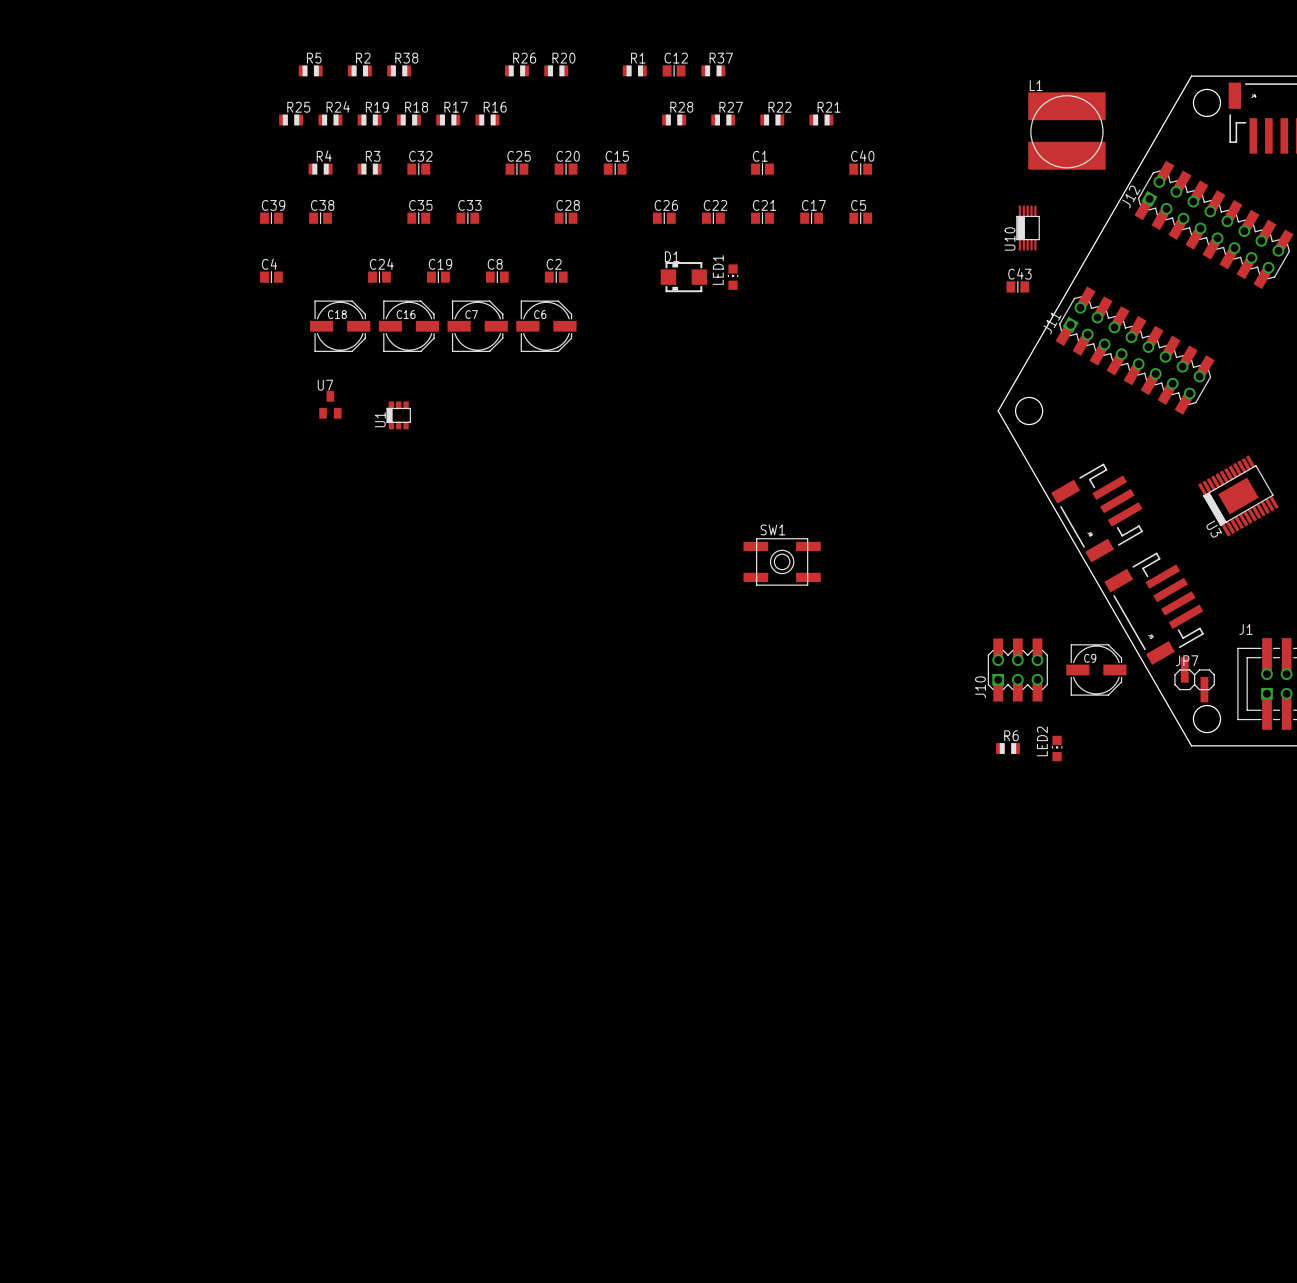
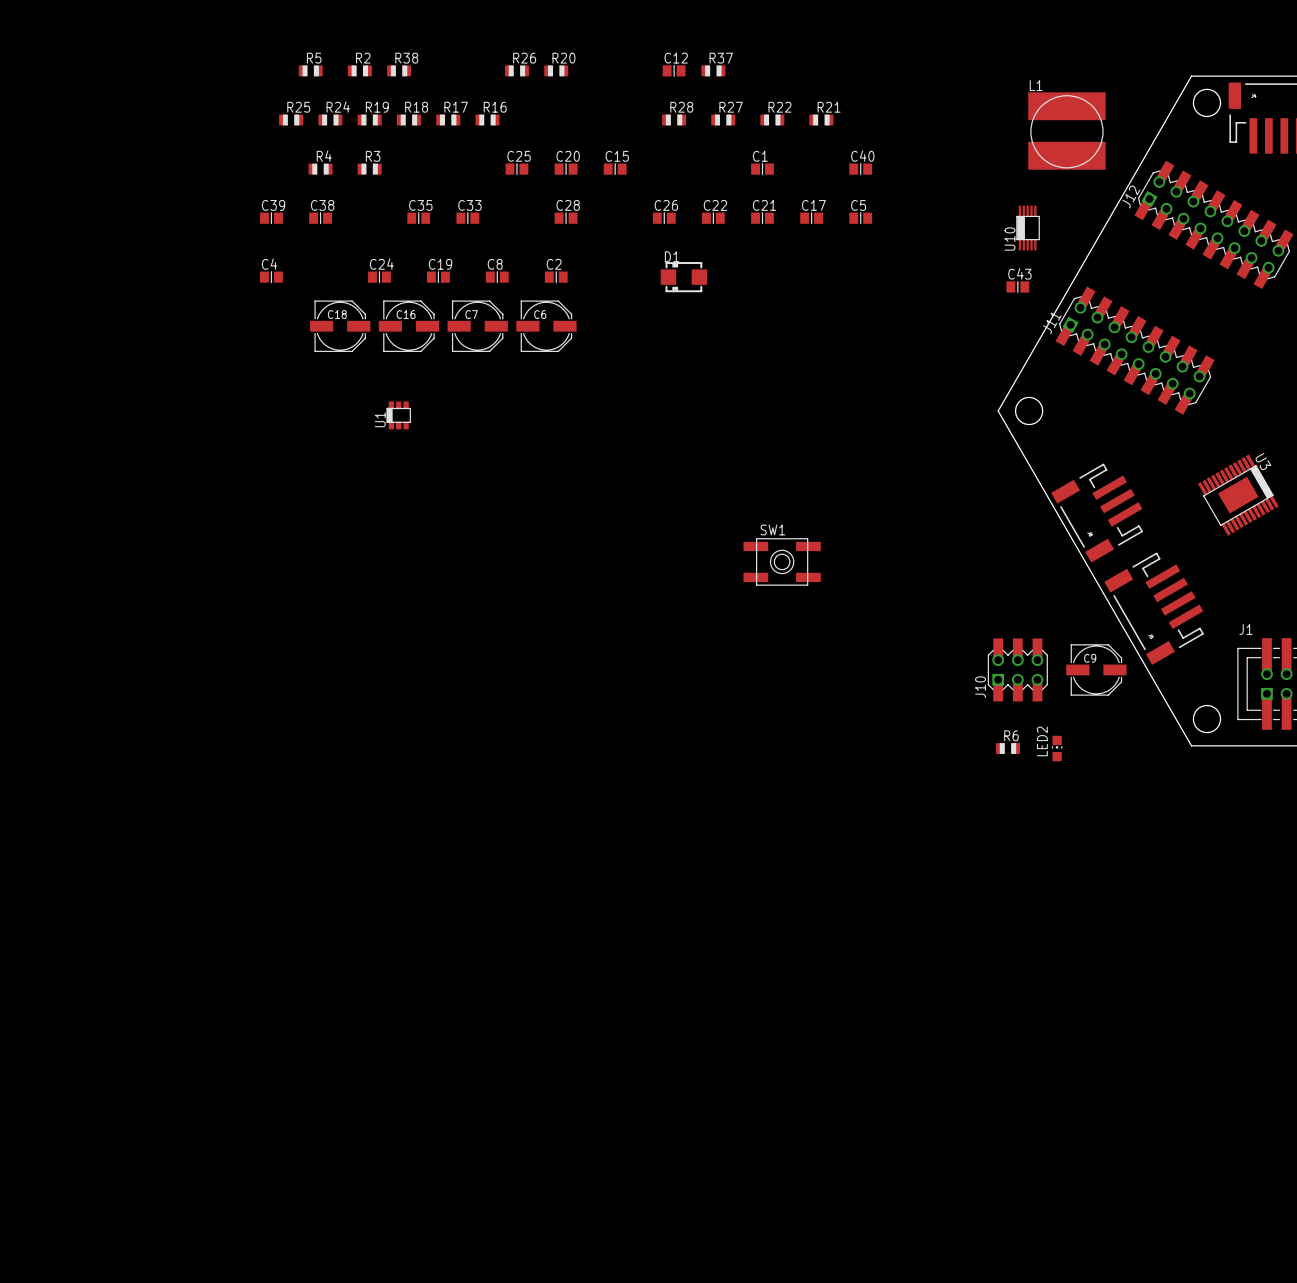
R1: (634, 70) -> none
C32: (418, 169) -> none
LED1: (733, 277) -> none
U7: (330, 404) -> none
U3 rotation: 0° (1238, 495) -> 180° (1238, 495)
JP7: (1194, 679) -> none

